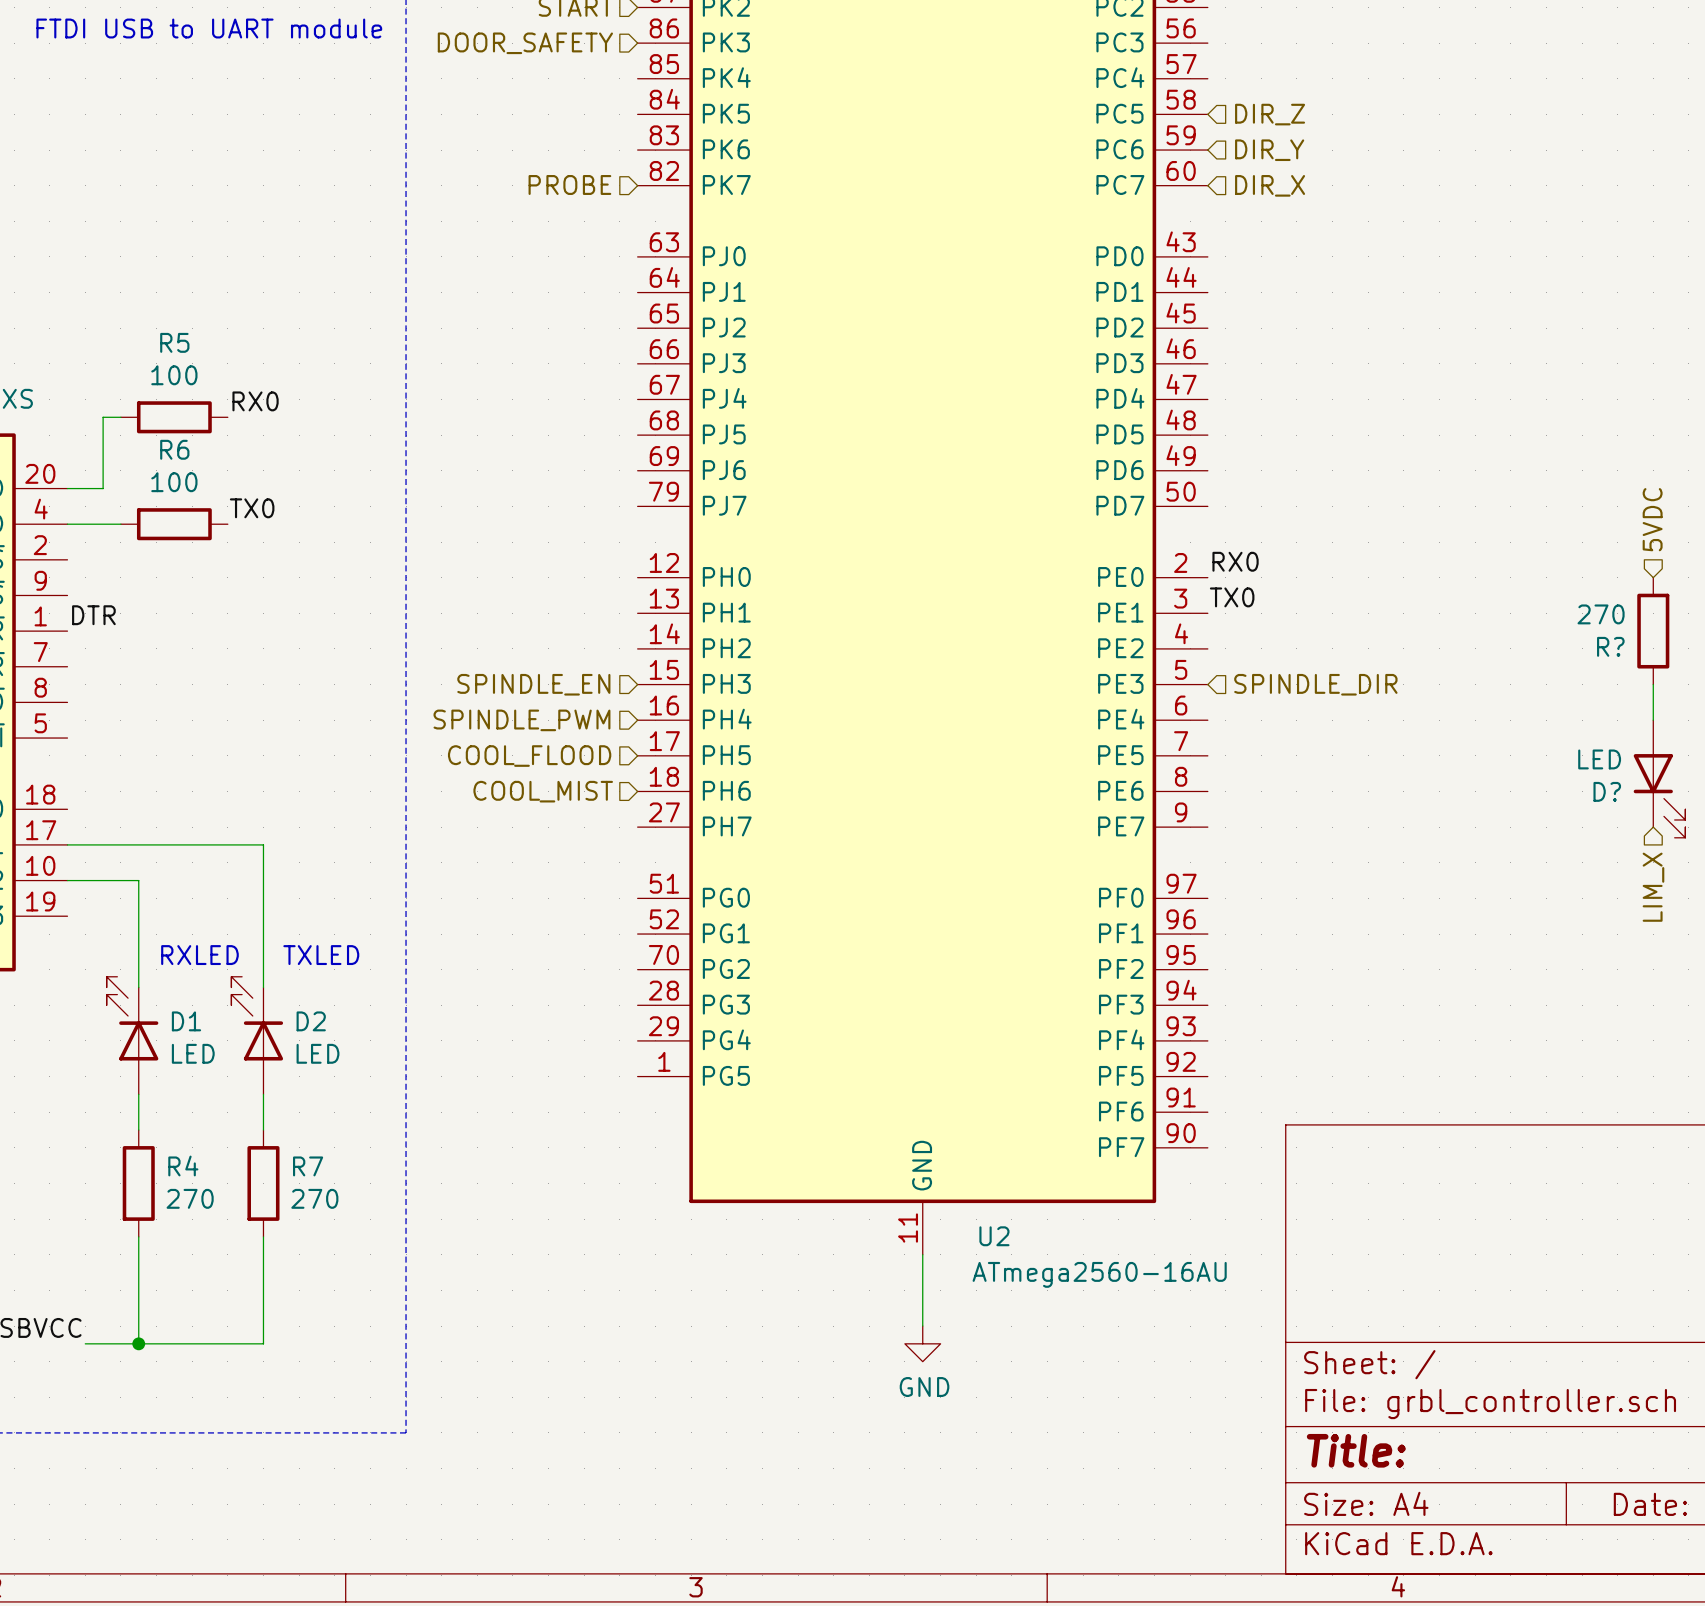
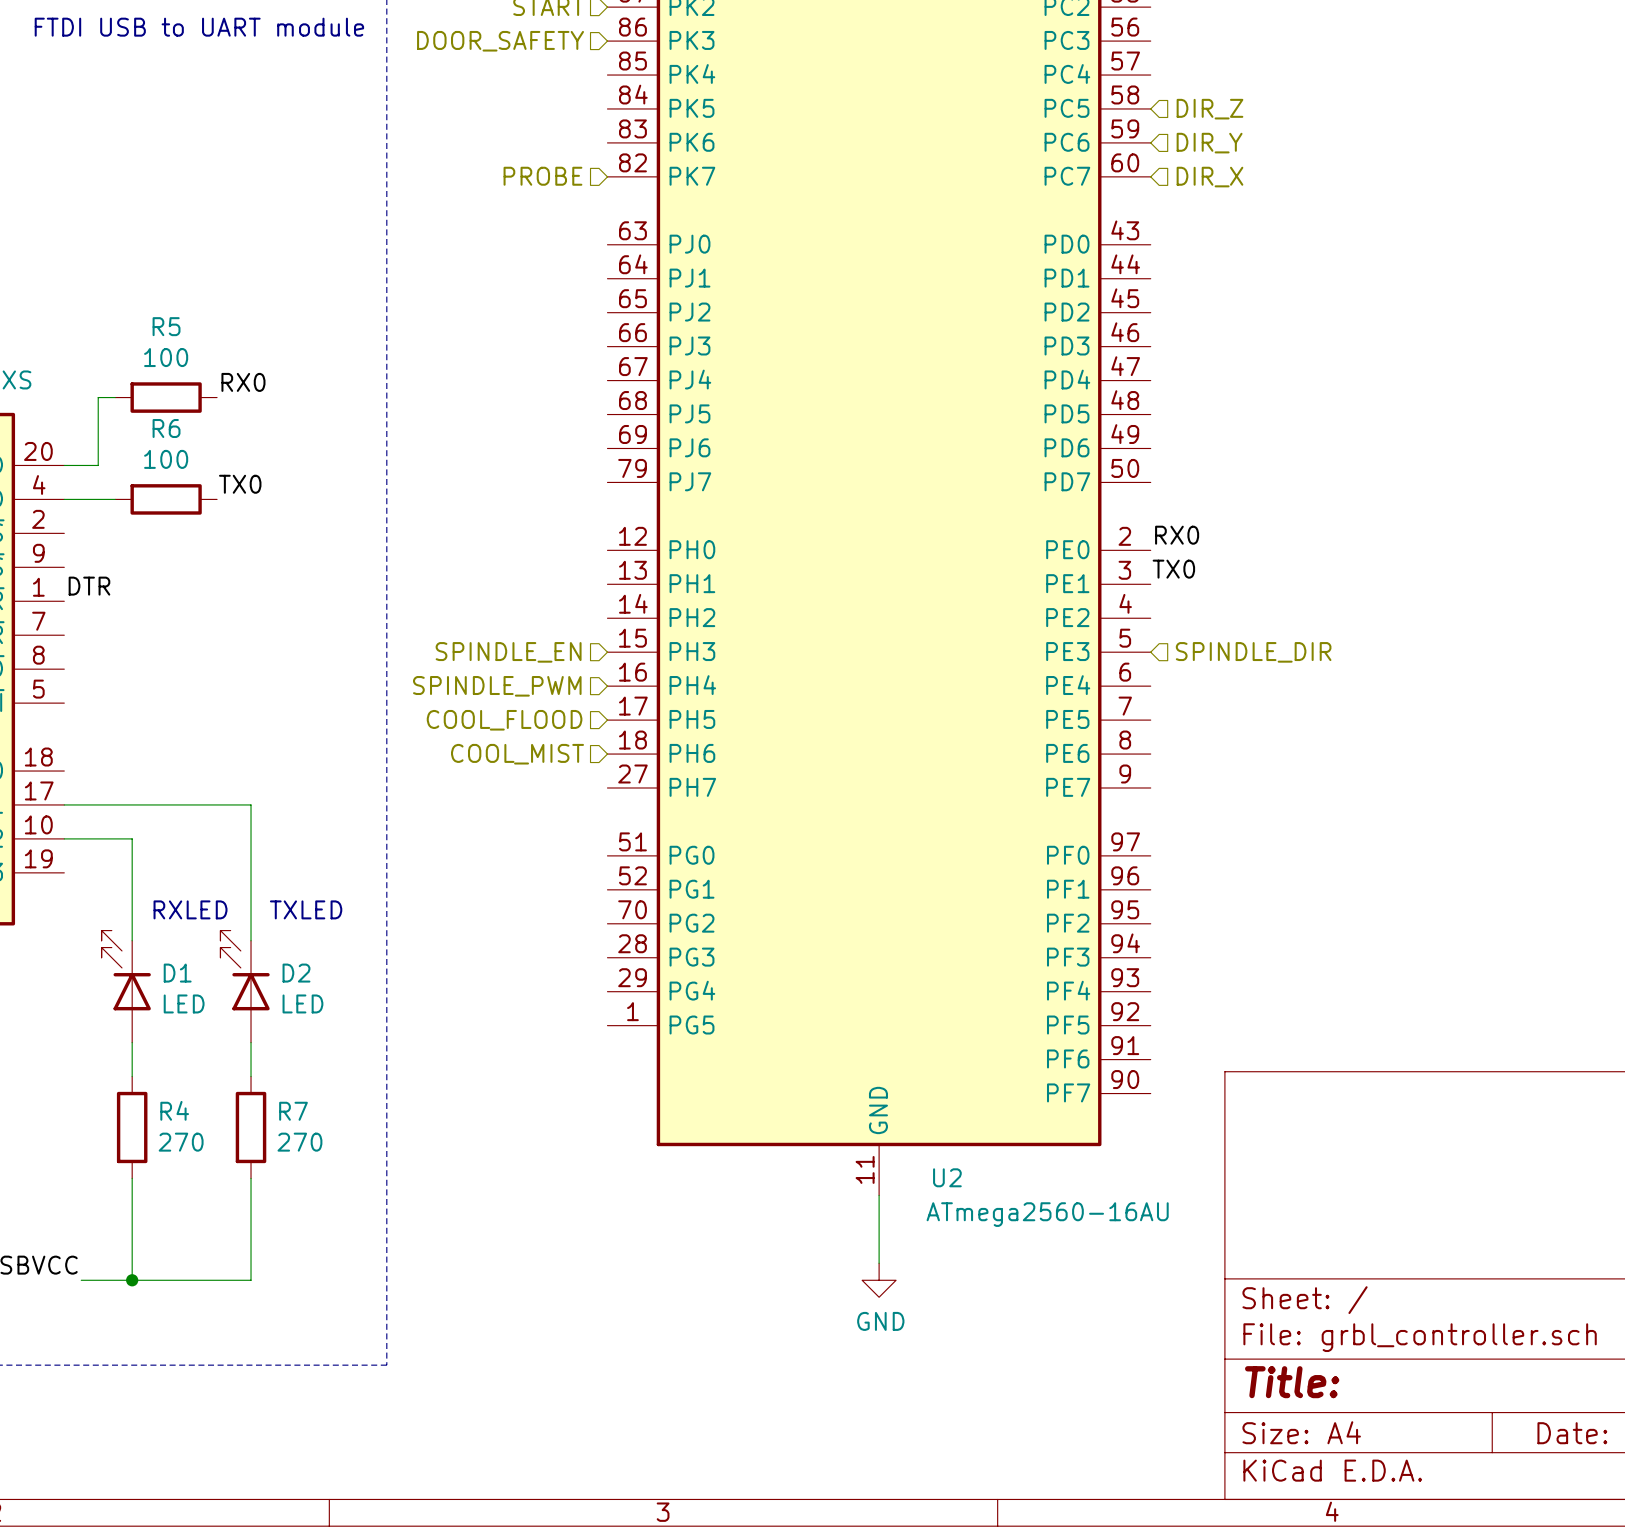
hierarchical label: 5VDC (1652, 519) -> none
R?: 270 (1653, 631) -> none
wire: (1653, 684) (1653, 720) -> none
D?: LED (1659, 779) -> none
hierarchical label: LIM_X (1653, 887) -> none

